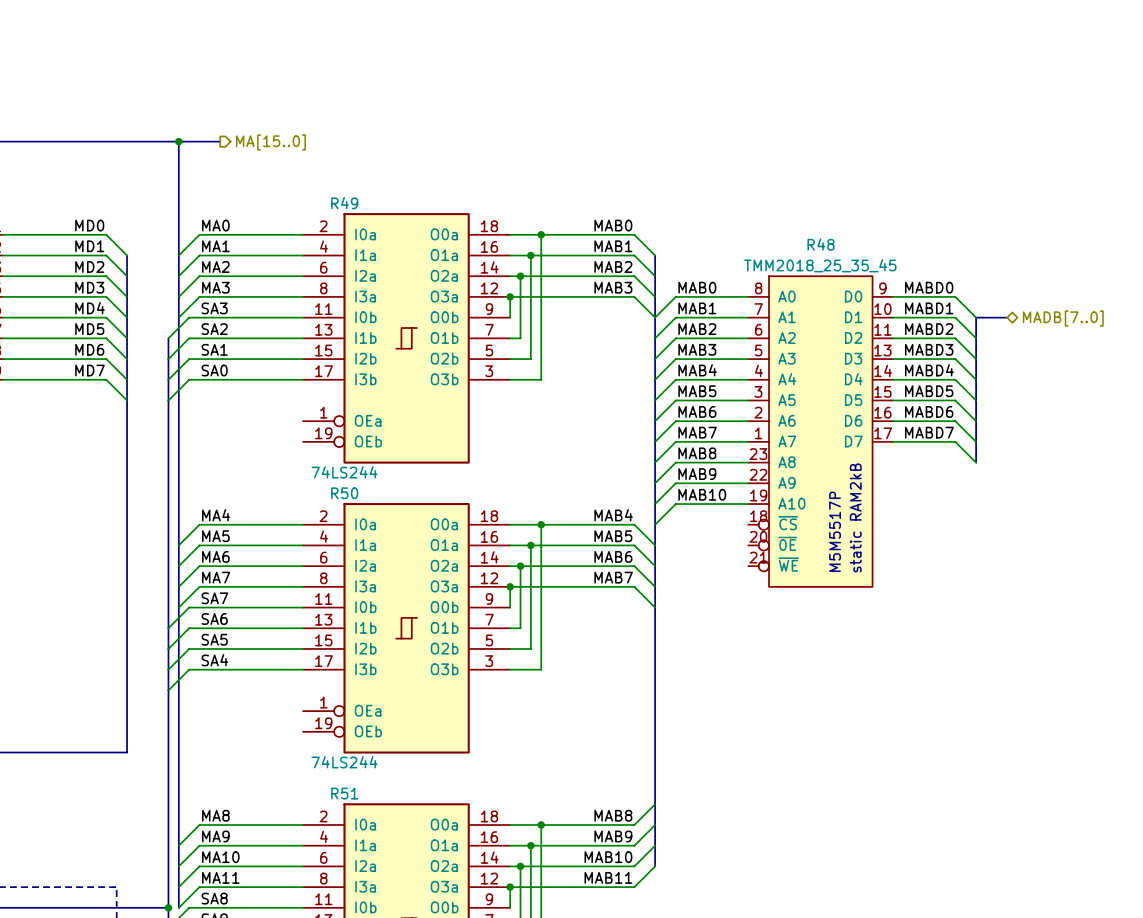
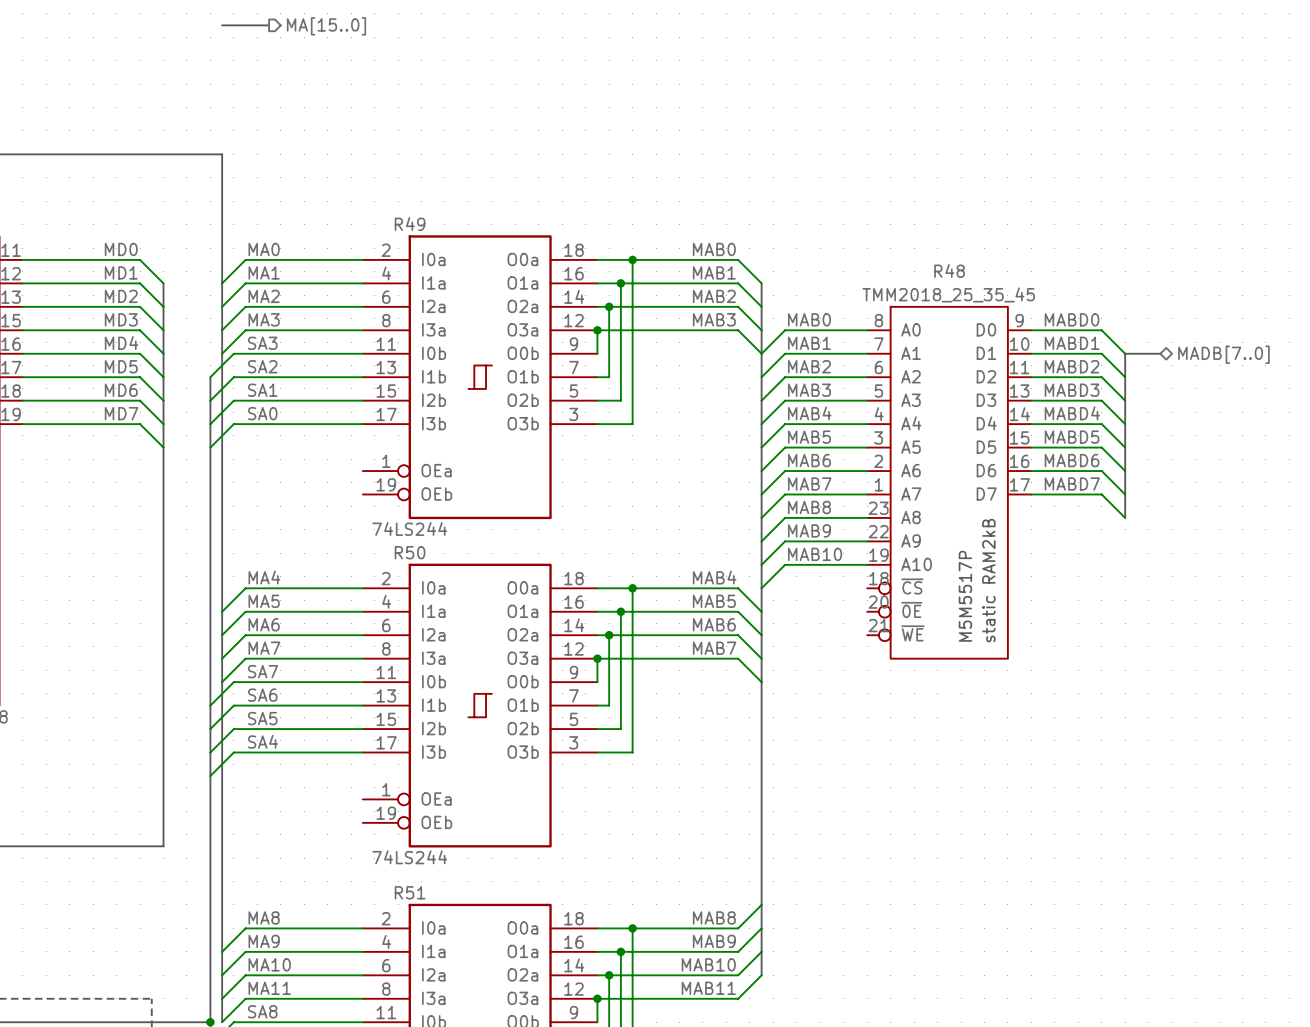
bus: (178, 141) (220, 141) -> (222, 25) (269, 25)
junction: (178, 141) -> none
hierarchical label position: MA[15..0] (270, 142) -> MA[15..0] (326, 26)

